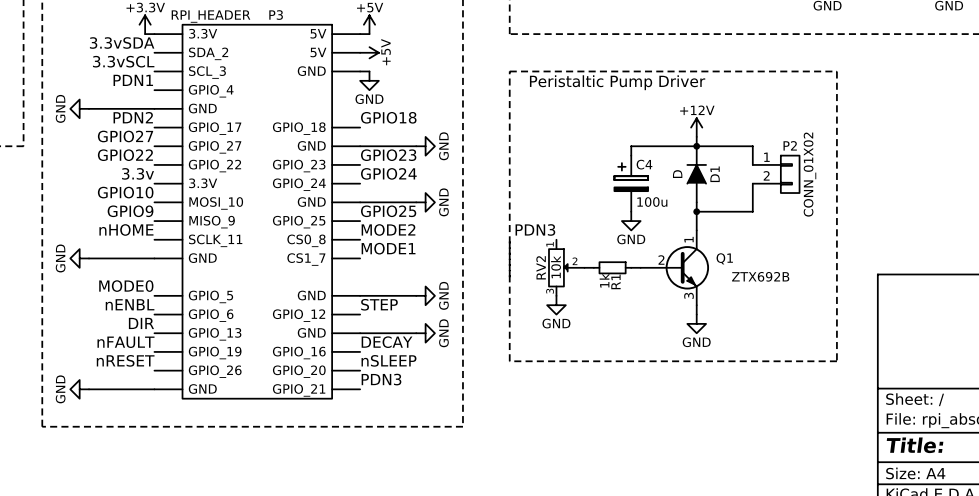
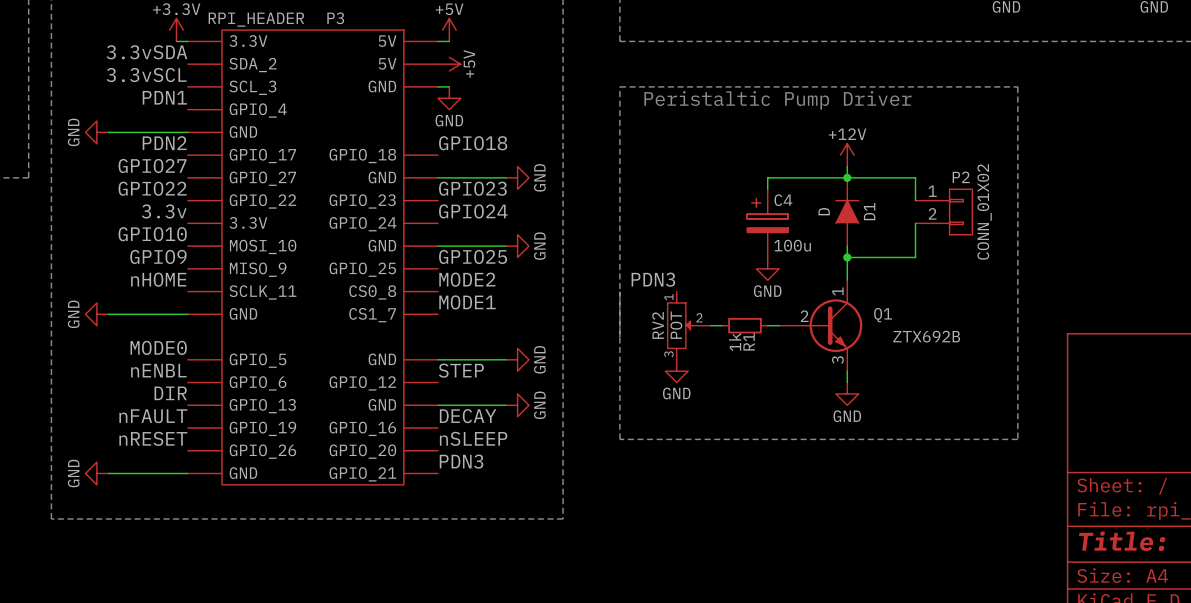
RV2 value: 10k (556, 267) -> POT (676, 325)

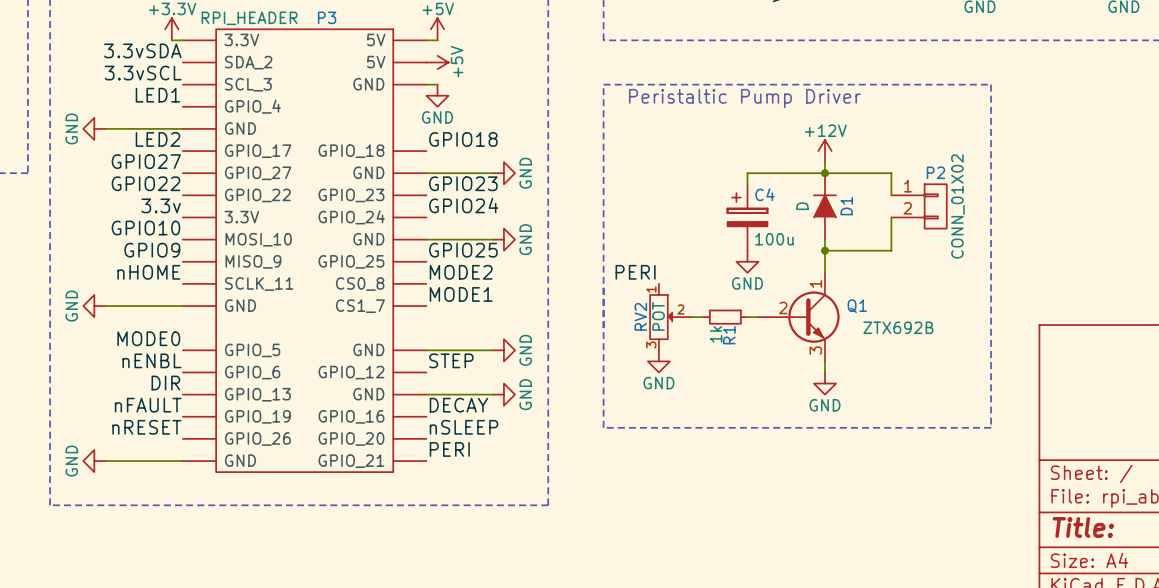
label: PDN1 (164, 97) -> LED1 (157, 95)
label: PDN2 (164, 143) -> LED2 (157, 139)
label: PDN3 (653, 279) -> PERI (635, 272)
label: PDN3 (461, 461) -> PERI (449, 449)

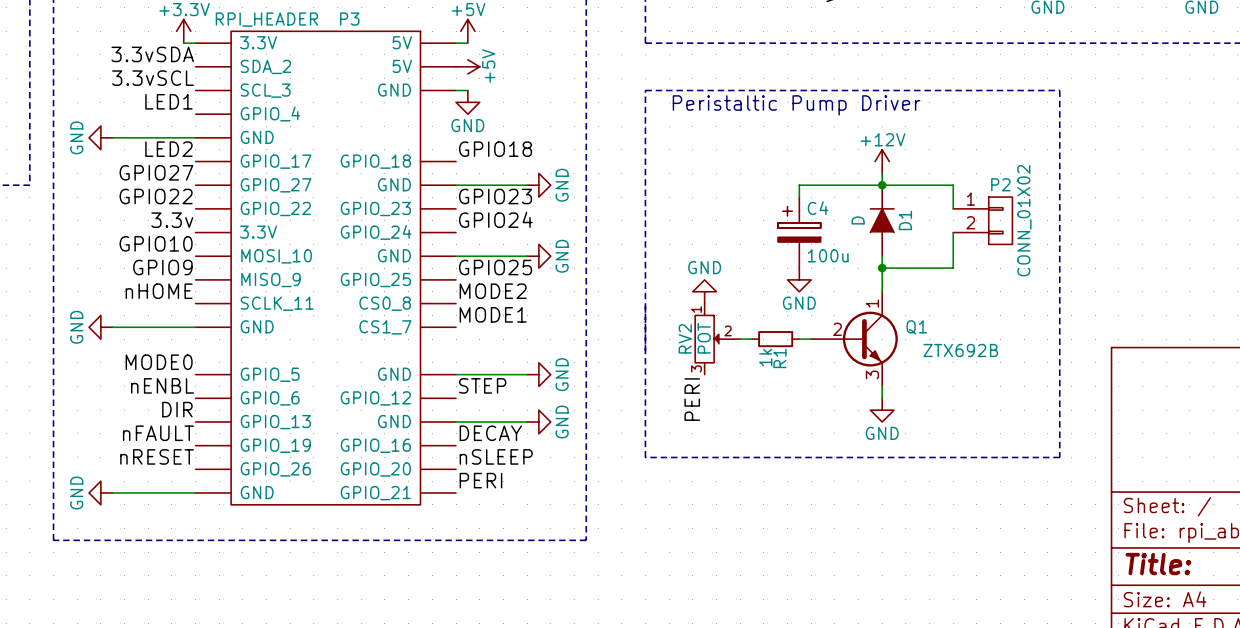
label rotation: 0° (635, 272) -> 90° counterclockwise (692, 399)
label position: PERI (635, 272) -> PERI (692, 399)
power symbol rotation: 0° (658, 361) -> 180° (704, 291)
power symbol position: GND (658, 361) -> GND (704, 291)

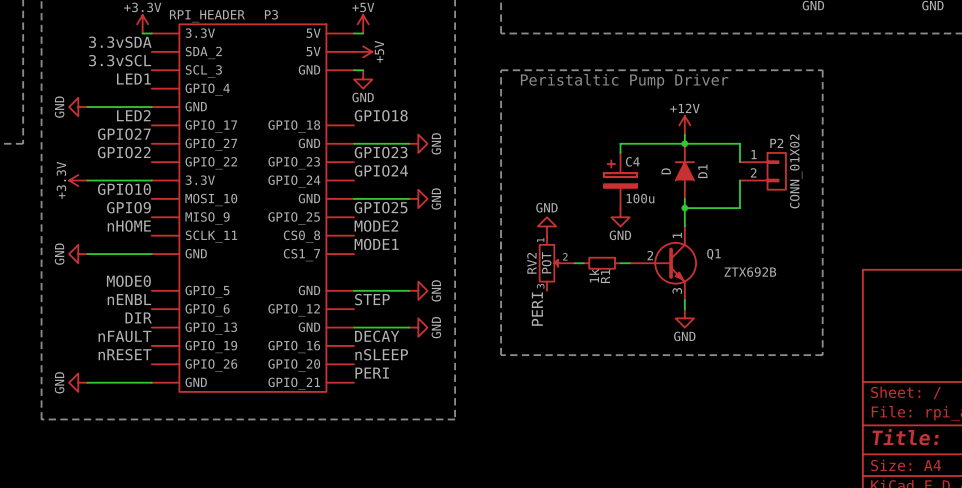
label: 3.3v (172, 220) -> none
power symbol: none -> +3.3V (78, 180)
wire: none -> (87, 180) (151, 180)

